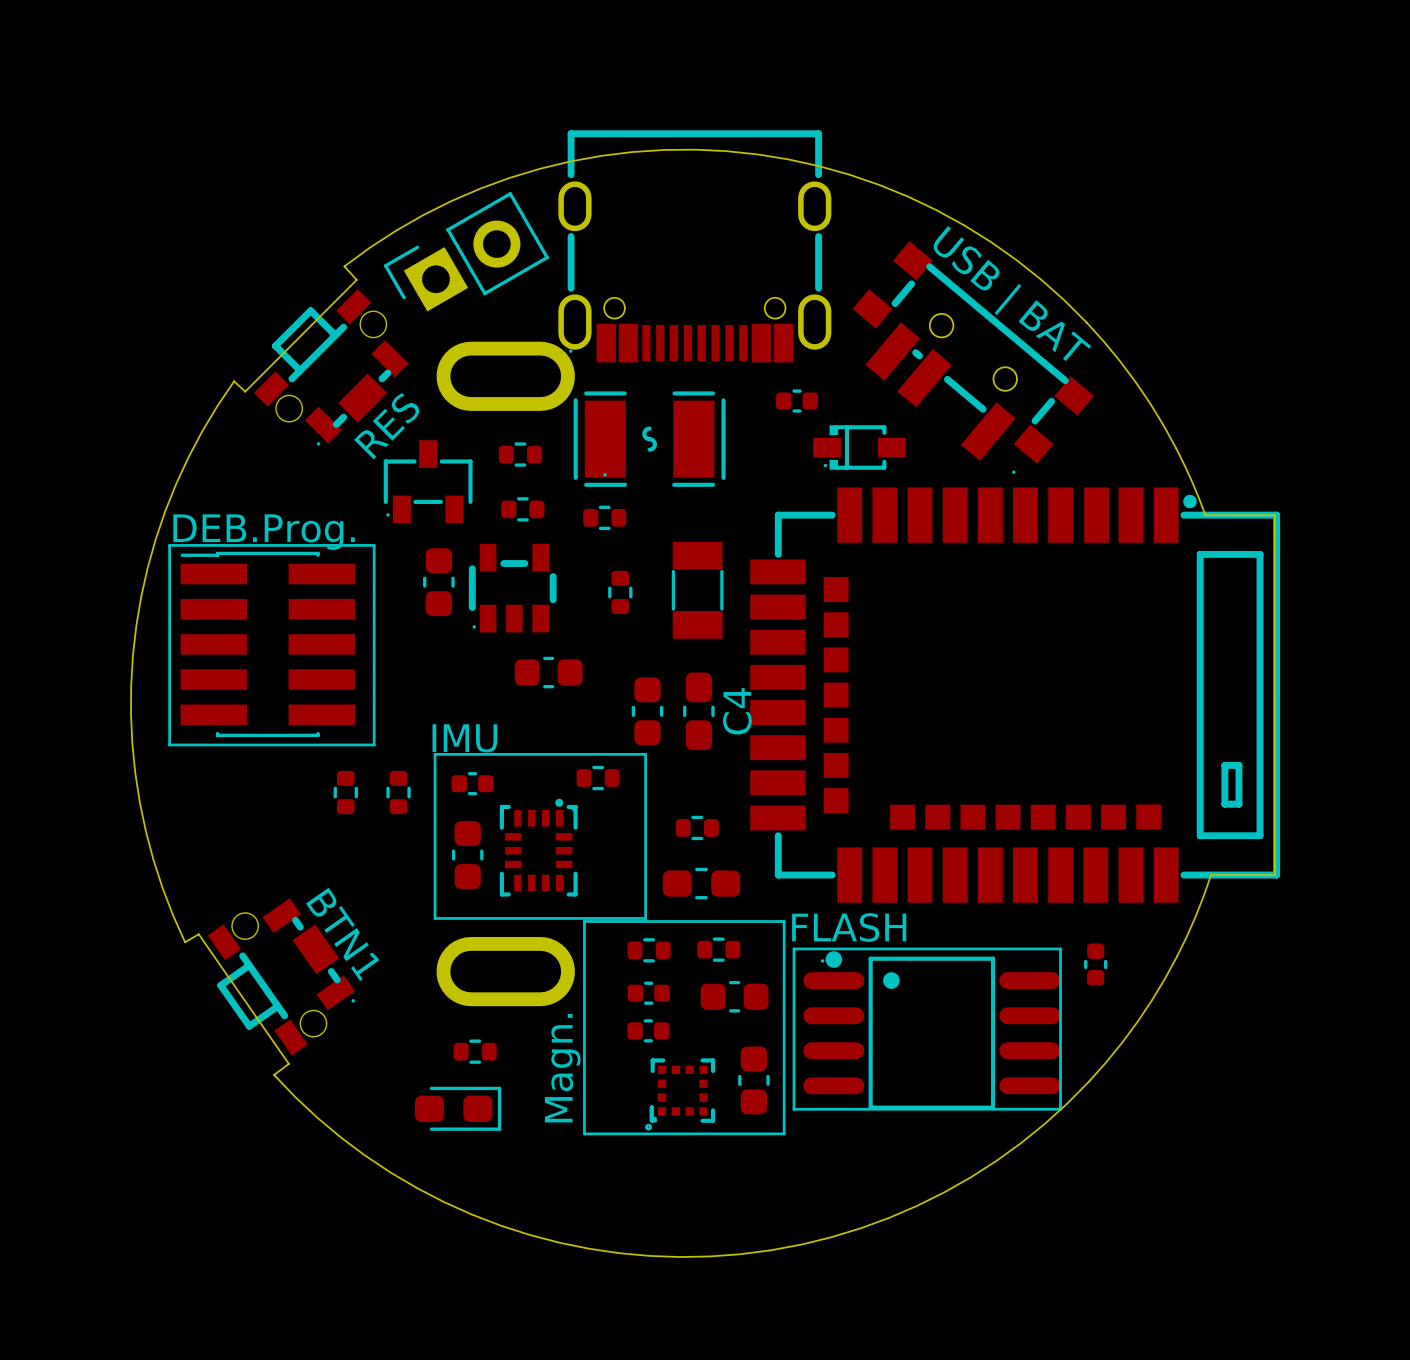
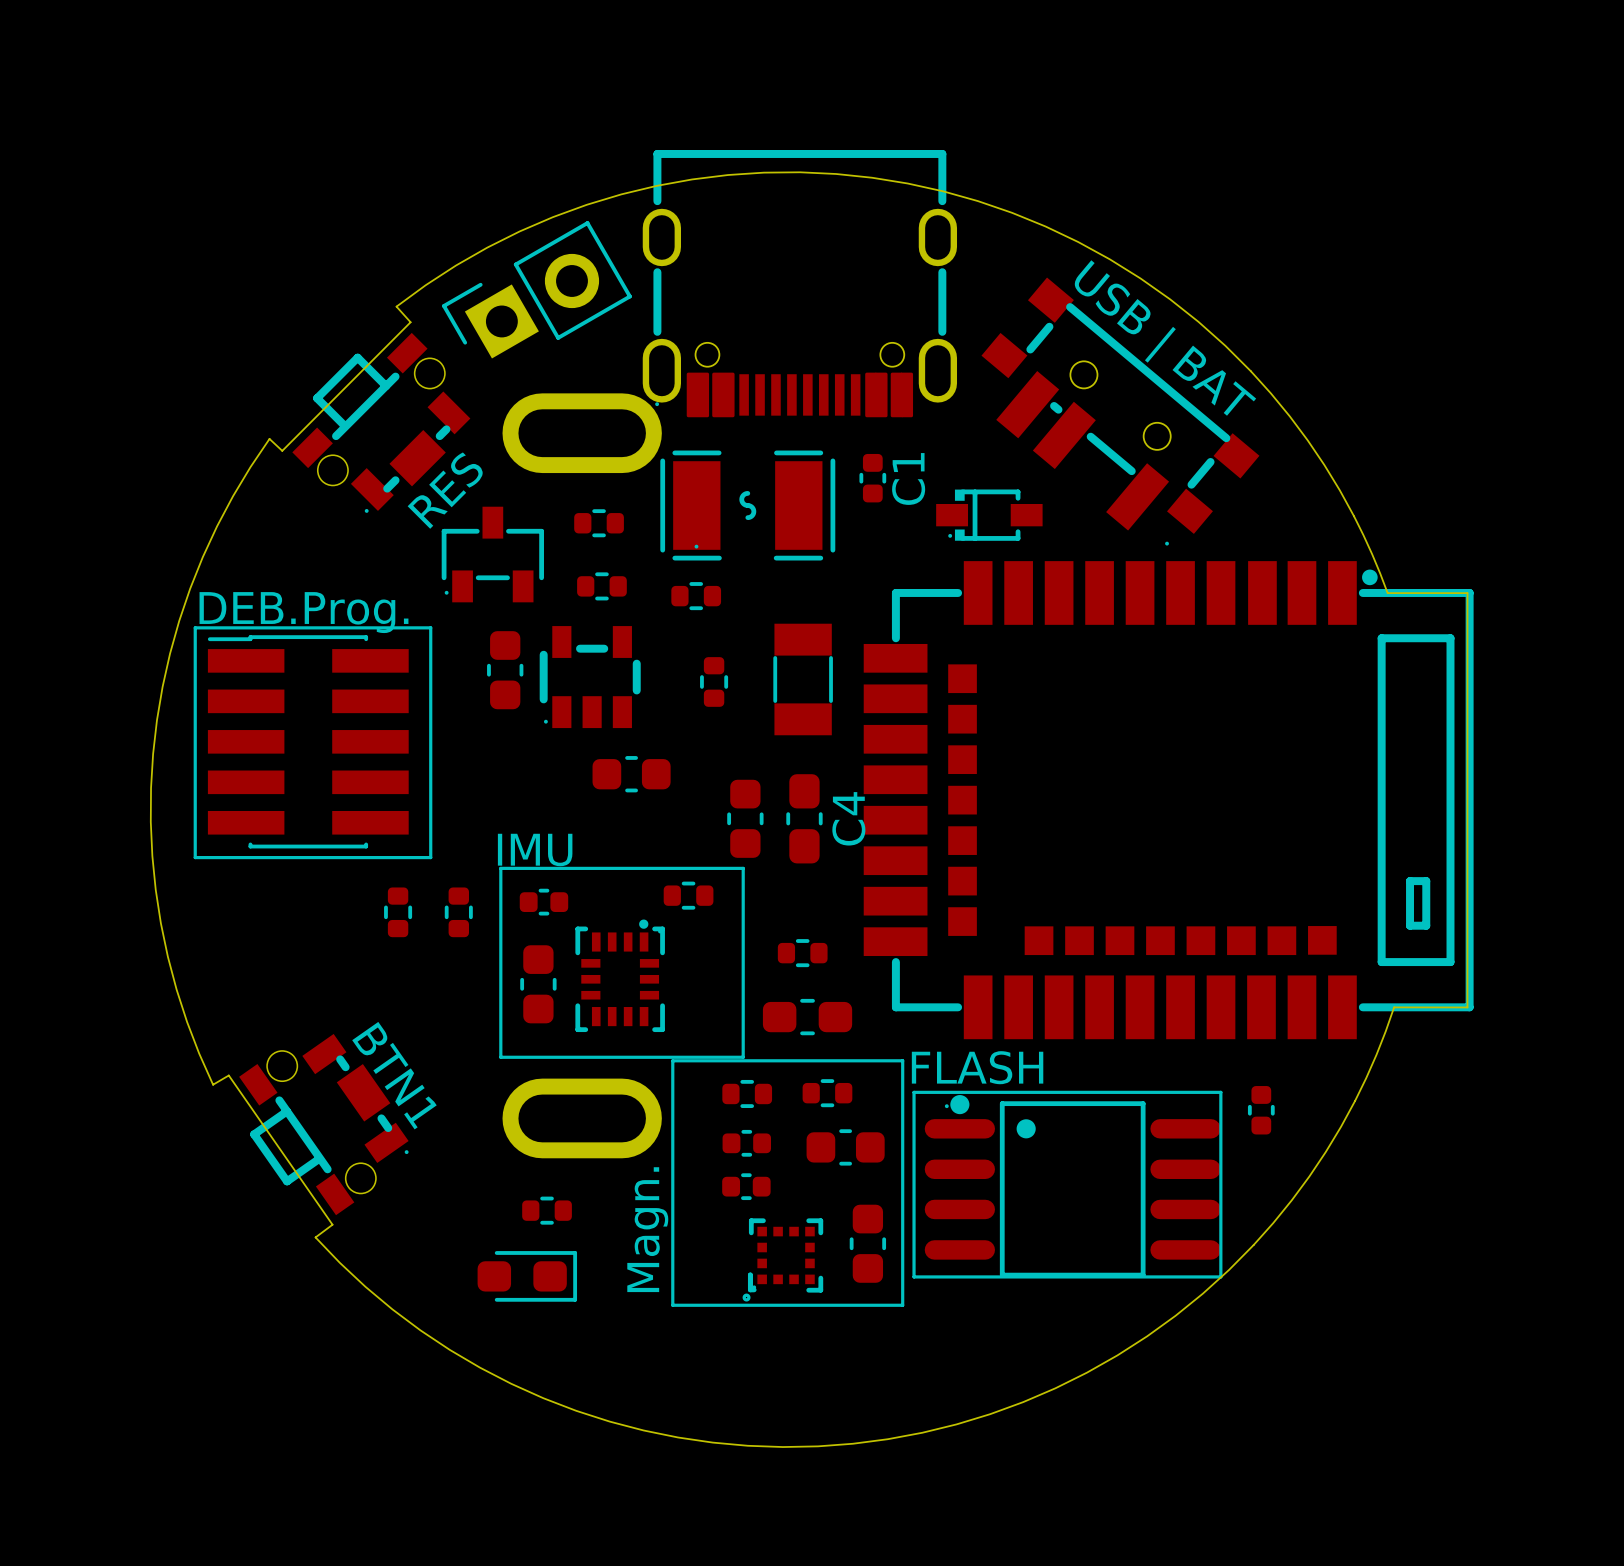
part: (797, 401) -> none
C1: none -> (872, 478)

